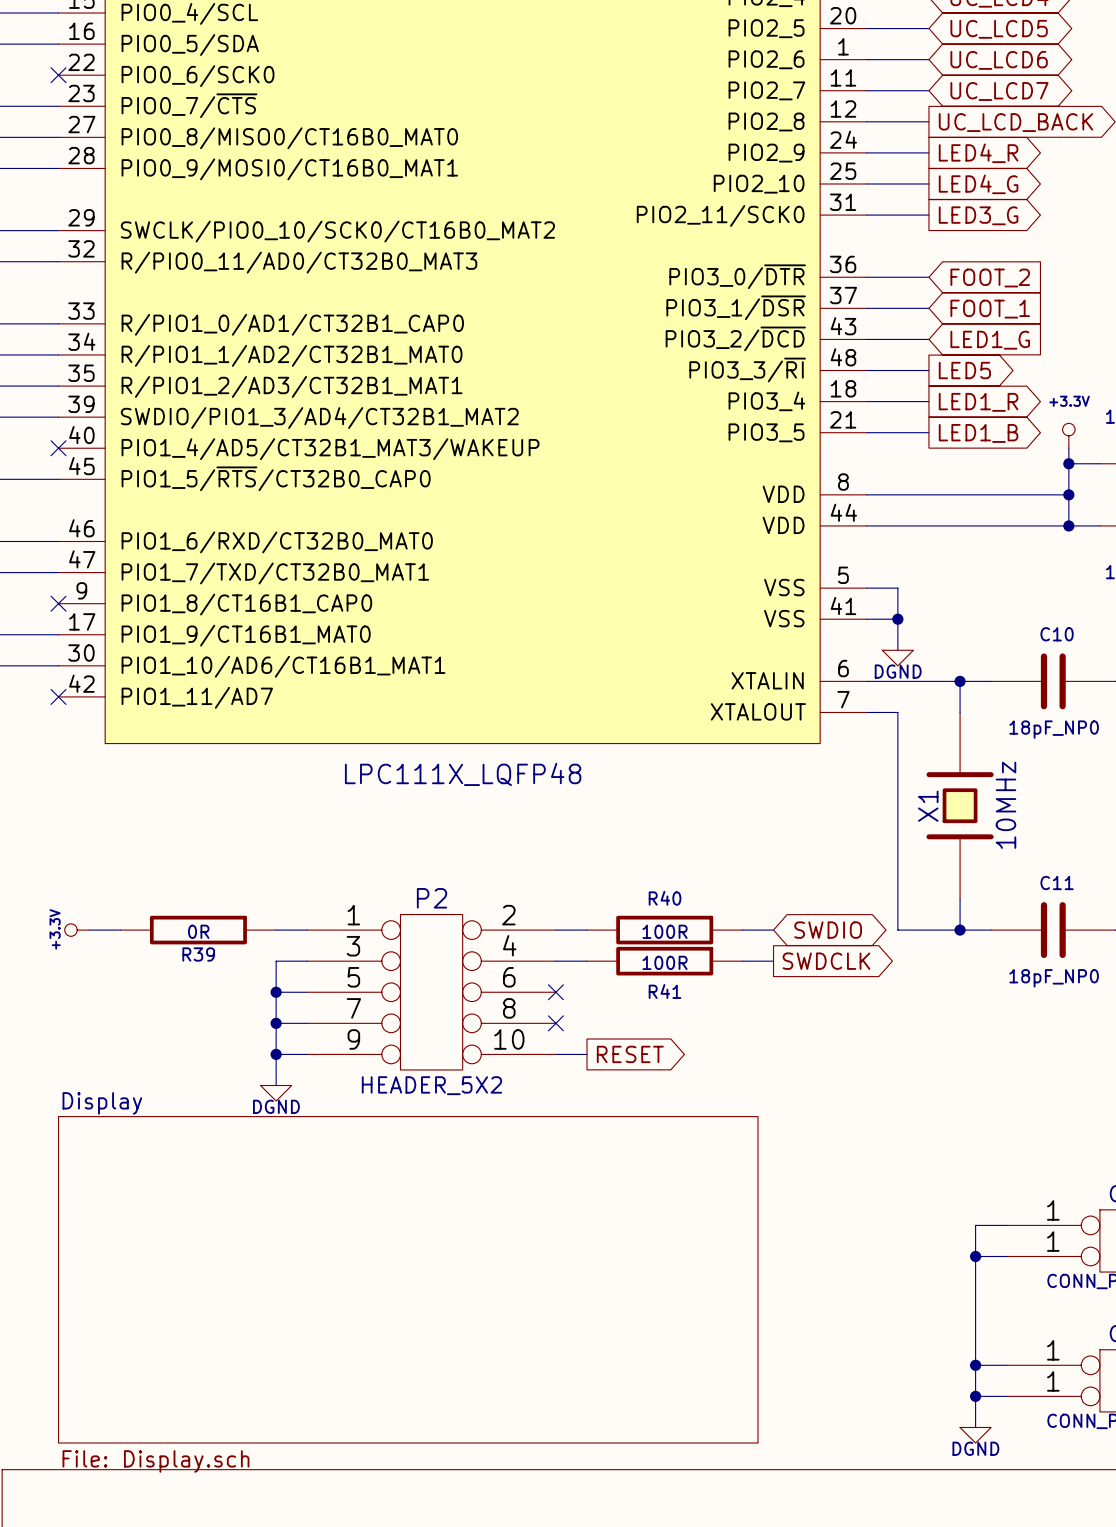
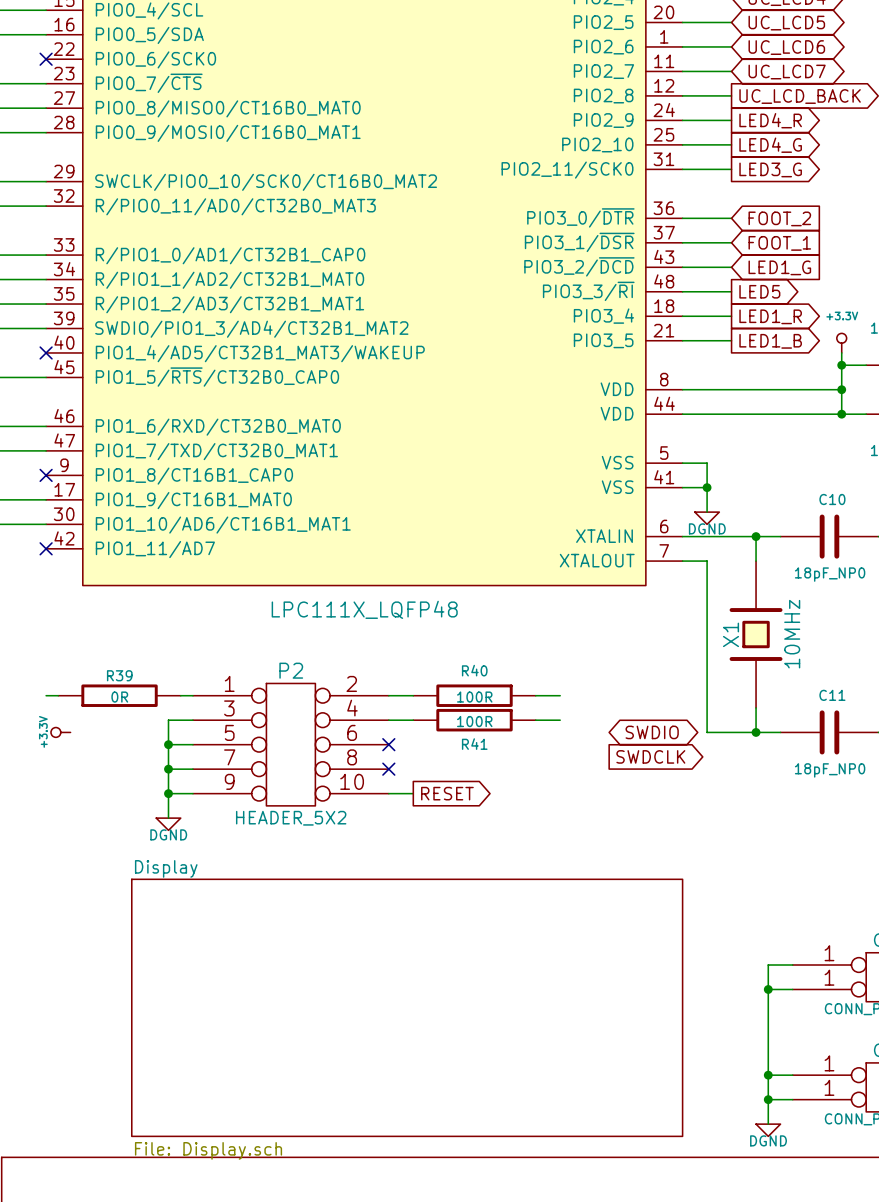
wire: none -> (46, 695) (58, 695)
wire: none -> (180, 695) (192, 695)
wire: (89, 930) (120, 930) -> none
R39 position: (198, 930) -> (119, 695)
wire: (276, 930) (307, 930) -> none
wire: (555, 930) (587, 930) -> (388, 695) (413, 695)
R40 position: (664, 930) -> (474, 695)
wire: (742, 930) (773, 930) -> (535, 695) (560, 695)
junction: none -> (168, 744)
no-connect mark: none -> (388, 744)
R39 name position: R39 (198, 954) -> R39 (119, 675)
wire: (307, 961) (276, 961) (276, 1085) -> (192, 720) (168, 720) (168, 818)
wire: (555, 961) (587, 961) -> (388, 720) (413, 720)
R41 position: (664, 961) -> (474, 720)
wire: (742, 961) (773, 961) -> (535, 720) (560, 720)
junction: none -> (168, 769)
no-connect mark: none -> (388, 769)
wire: (276, 992) (307, 992) -> (168, 744) (192, 744)
junction: (276, 992) -> none
P2 position: (431, 992) -> (290, 744)
no-connect mark: (555, 992) -> none
junction: none -> (168, 793)
wire: (276, 1023) (307, 1023) -> (168, 769) (192, 769)
junction: (276, 1023) -> none
no-connect mark: (555, 1023) -> none
wire: (276, 1054) (307, 1054) -> (168, 793) (192, 793)
junction: (276, 1054) -> none
wire: (555, 1054) (587, 1054) -> (388, 793) (413, 793)
global label position: RESET (630, 1054) -> RESET (447, 793)
power symbol position: DGND (276, 1093) -> DGND (168, 824)
sheet Display position: (408, 1279) -> (407, 1007)

